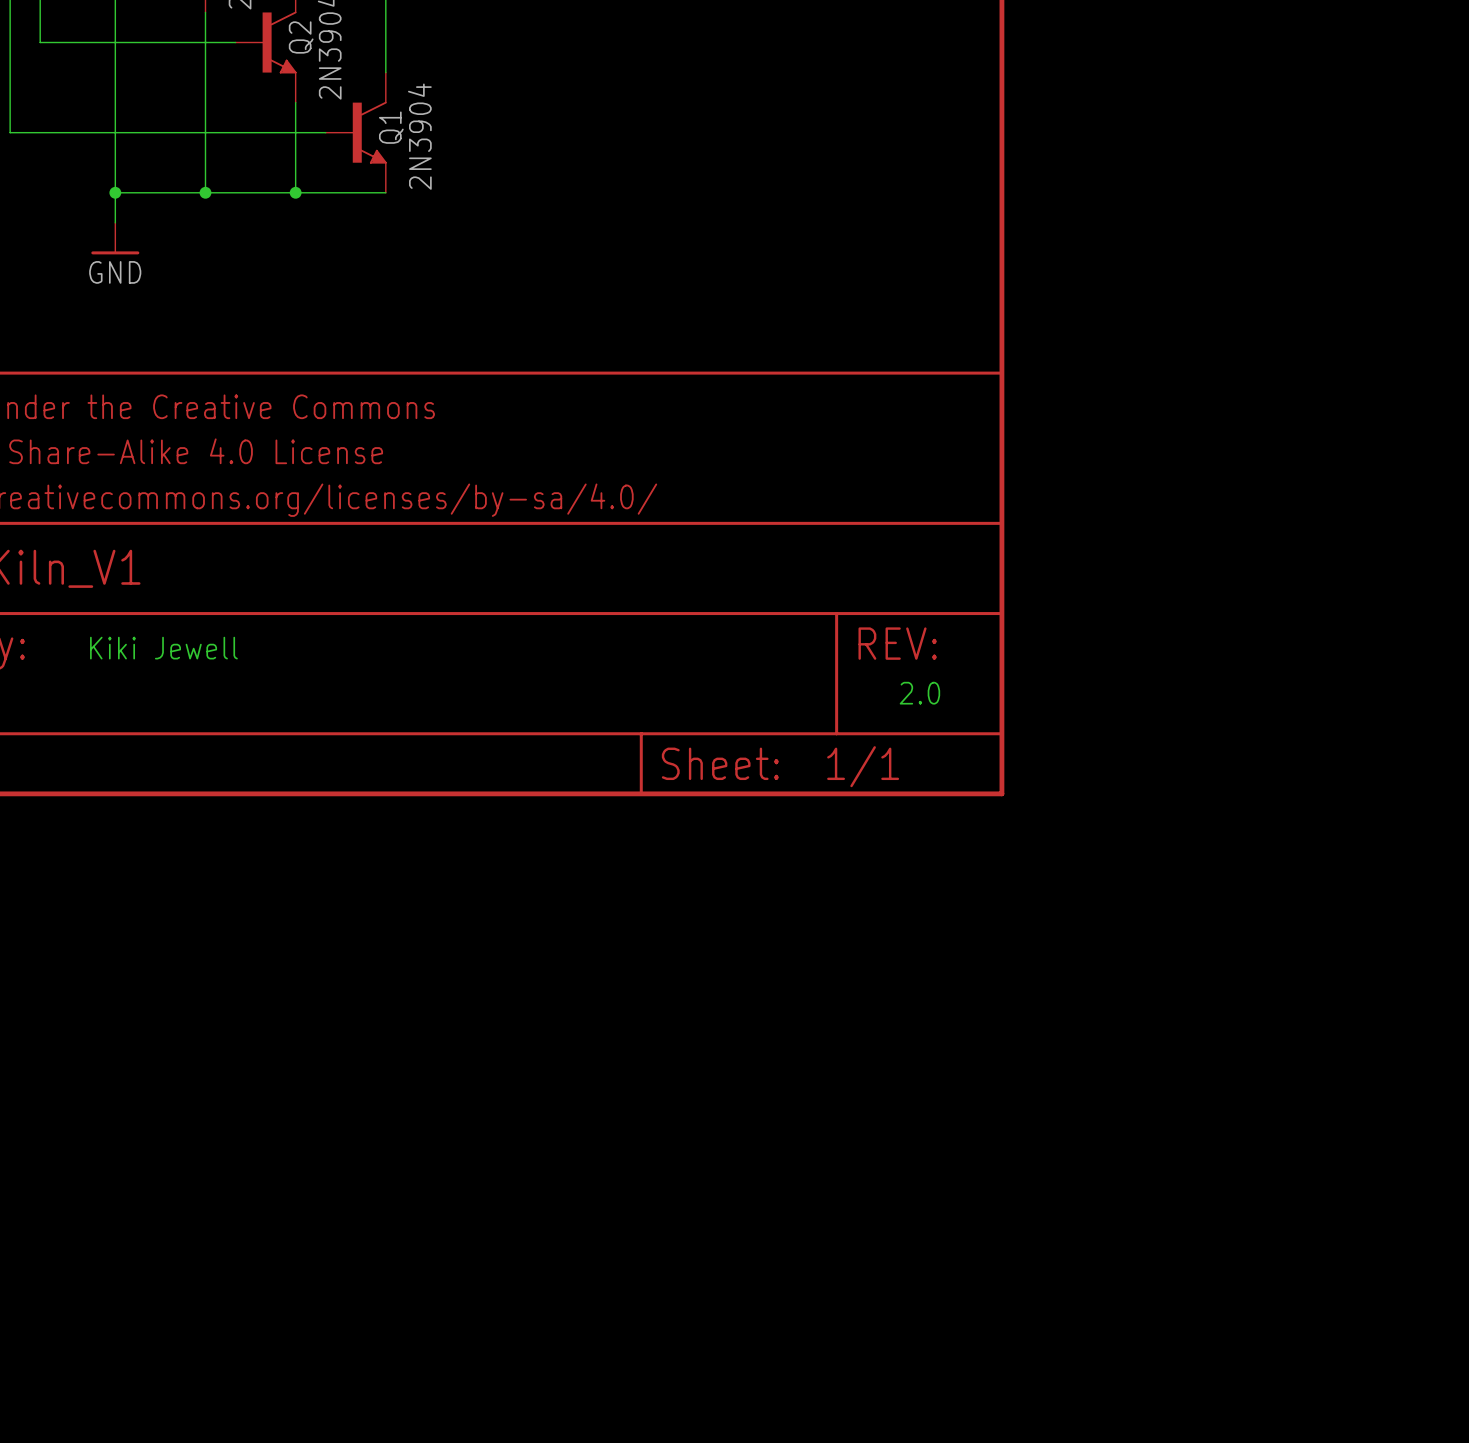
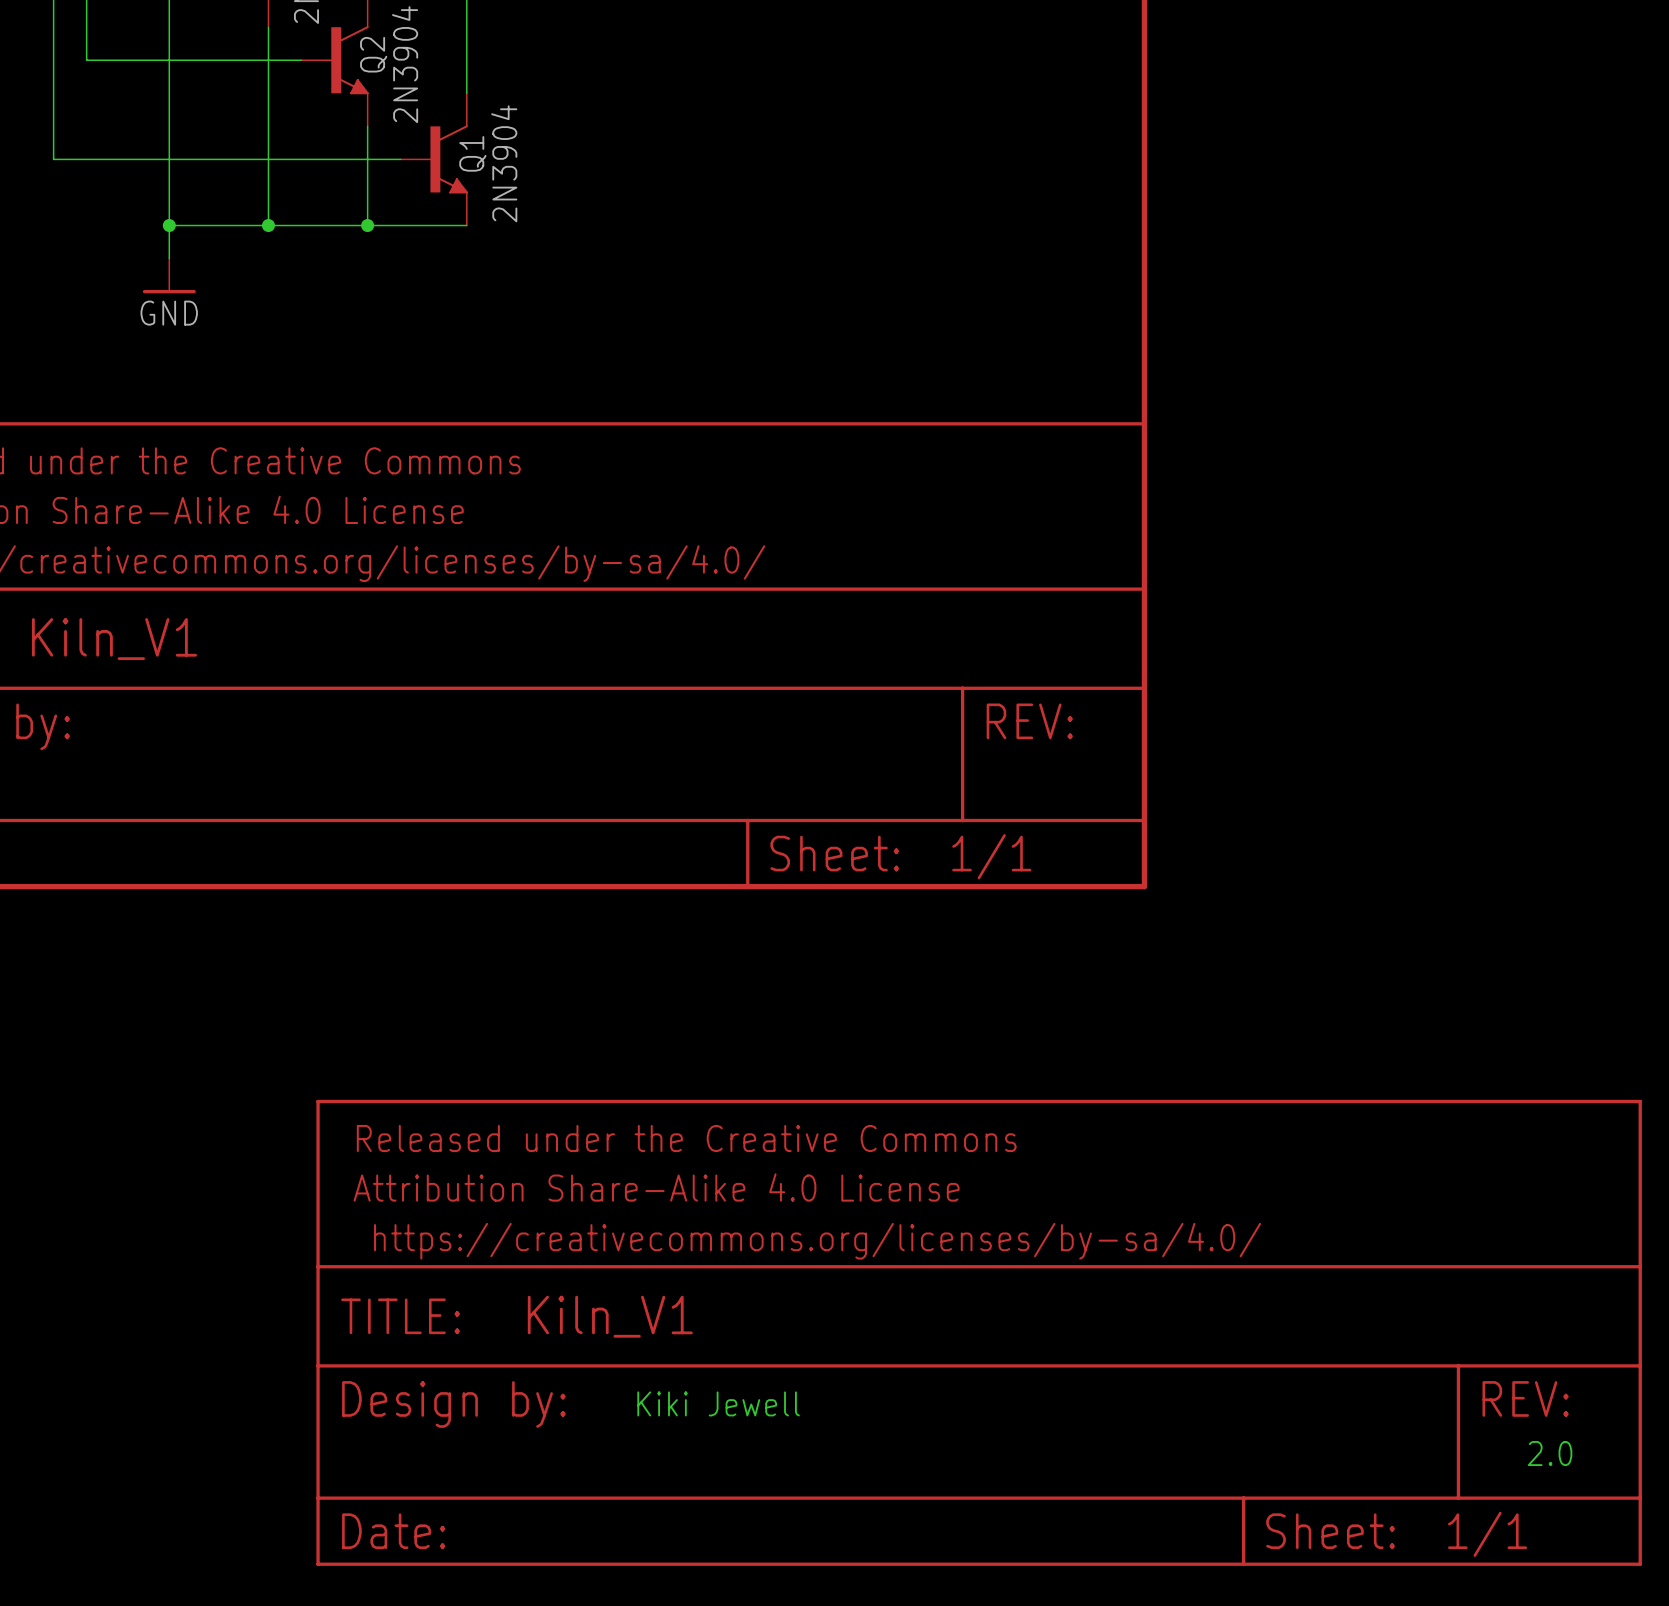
text: Kiki Jewell (163, 648) -> none
text: 2.0 (919, 693) -> none
part: none -> (979, 1332)
text: none -> Kiki Jewell (718, 1403)
text: none -> 2.0 (1550, 1453)

